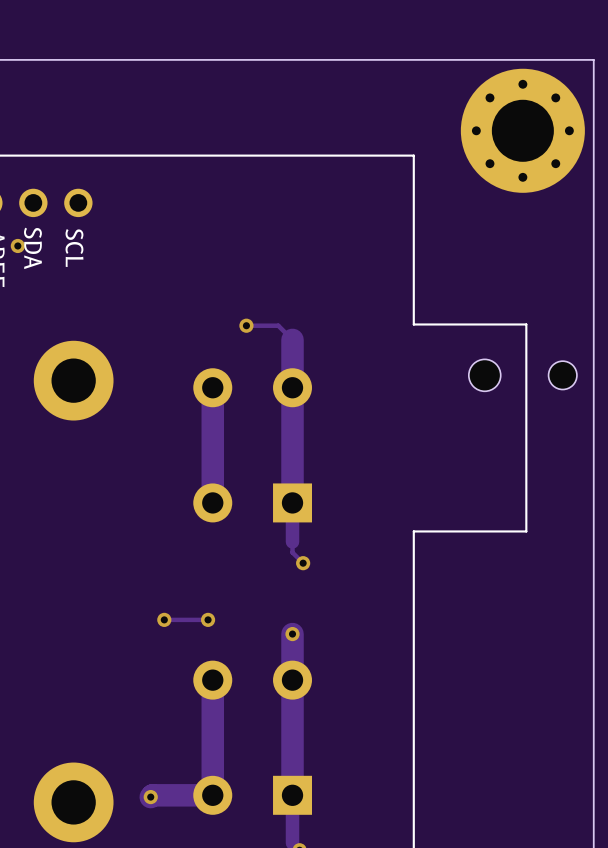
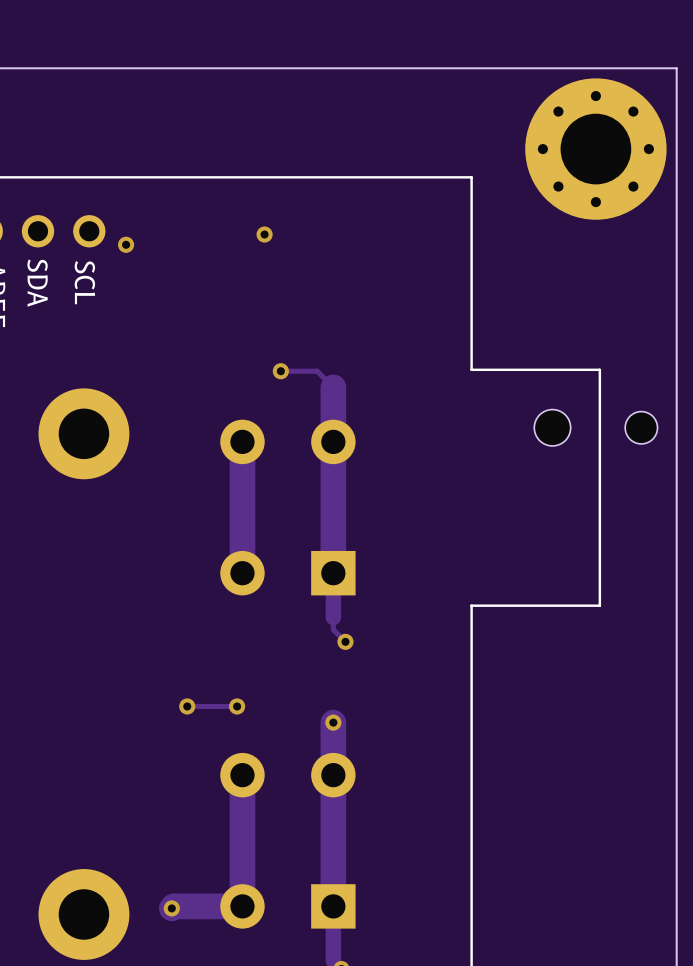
via: none -> (264, 234)
via position: (17, 245) -> (126, 244)

